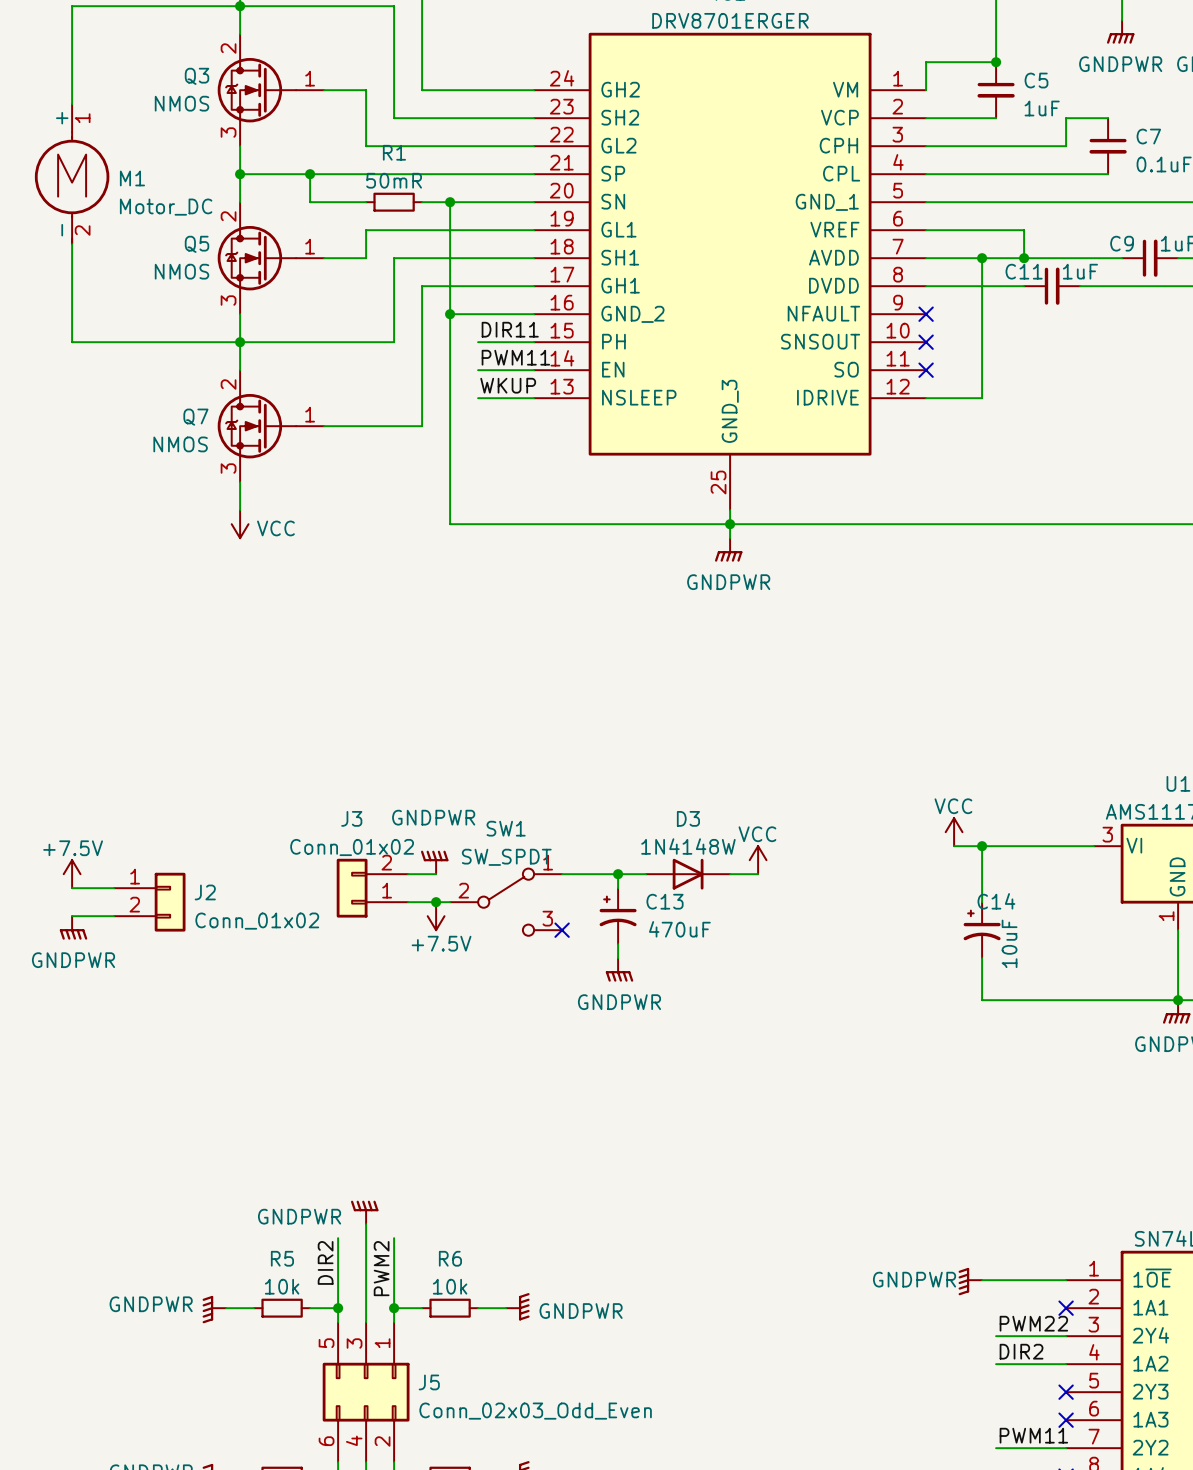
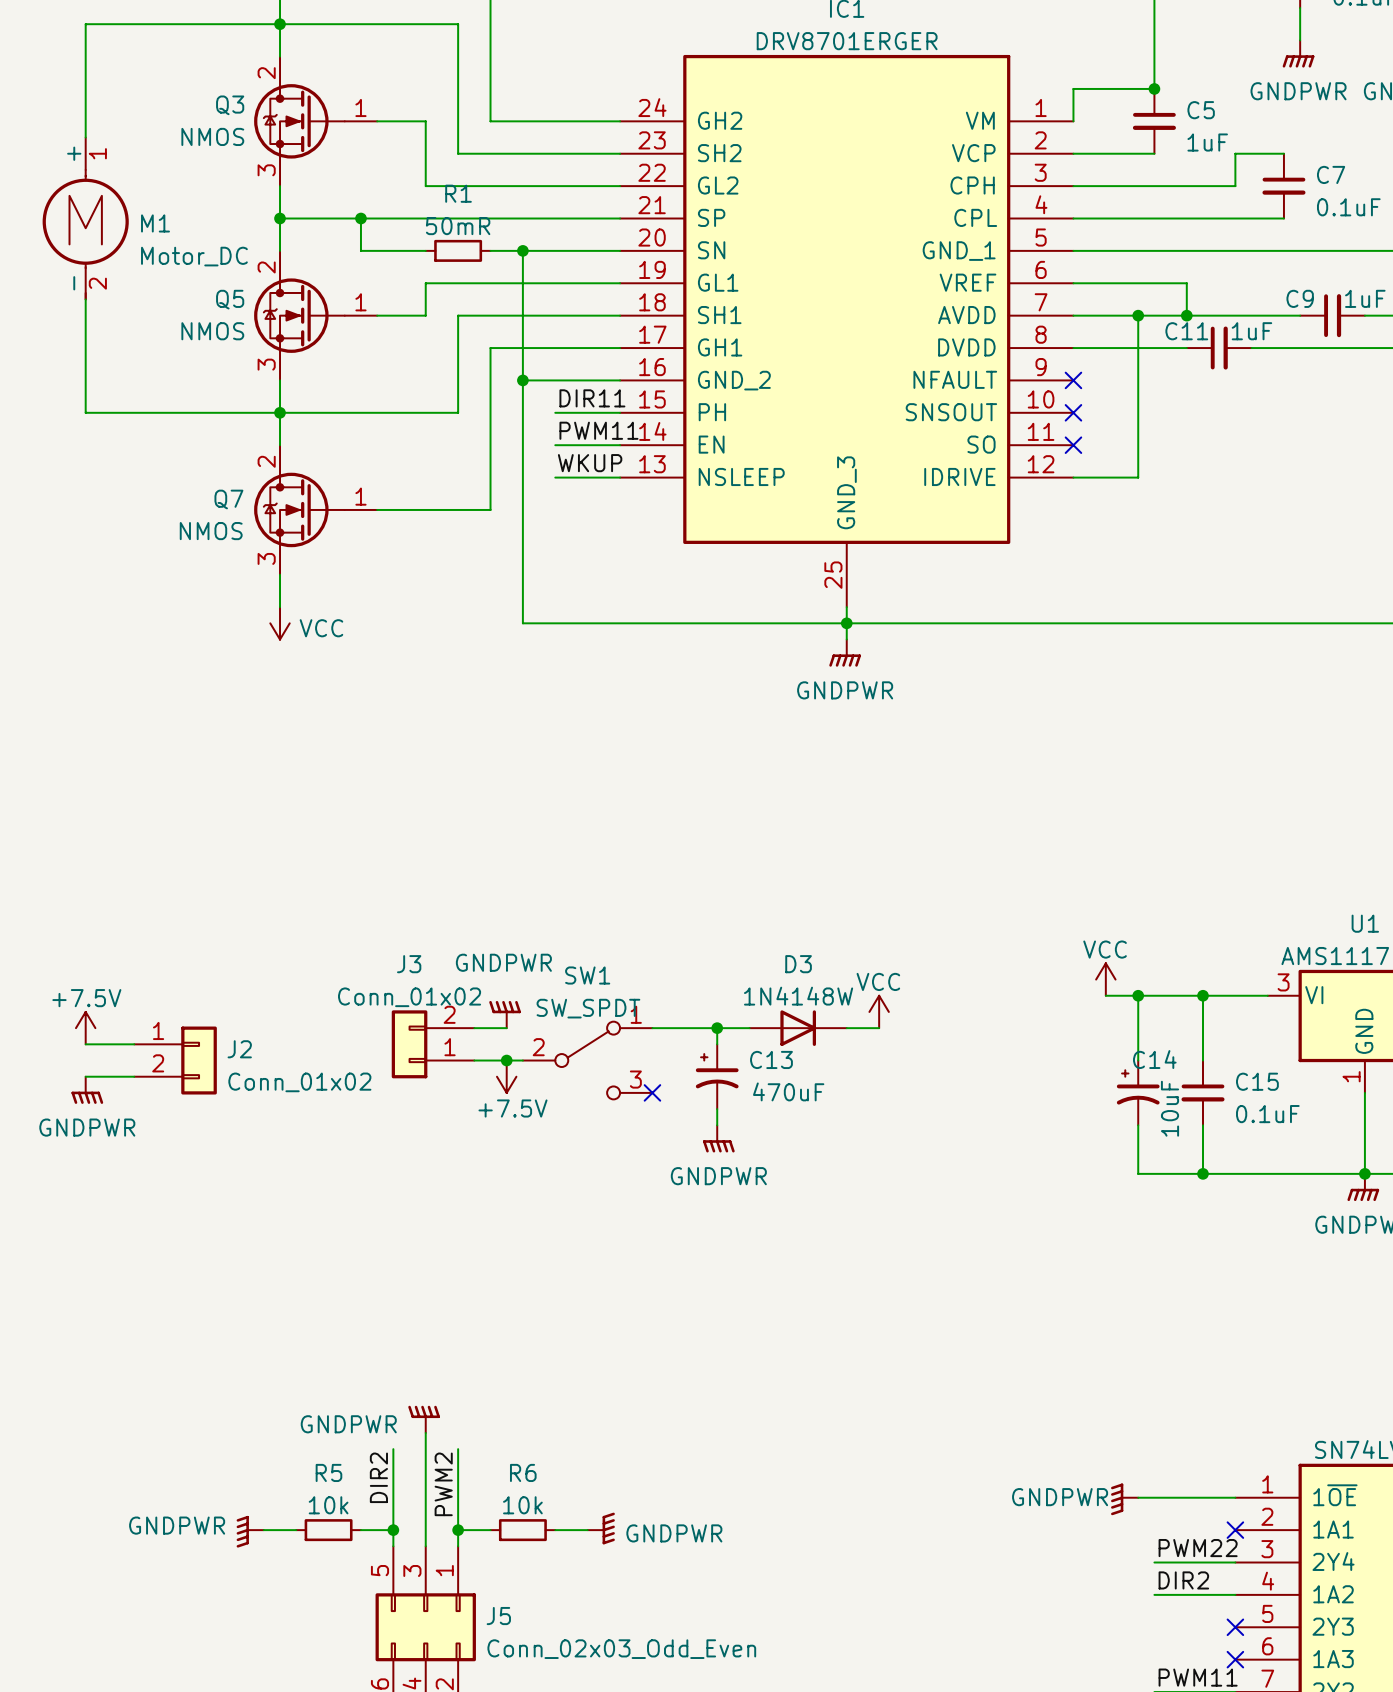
wire: none -> (1203, 995) (1203, 1060)
junction: none -> (1203, 995)
C15: none -> 0.1uF (1203, 1092)
wire: none -> (1203, 1125) (1203, 1173)
junction: none -> (1203, 1173)

